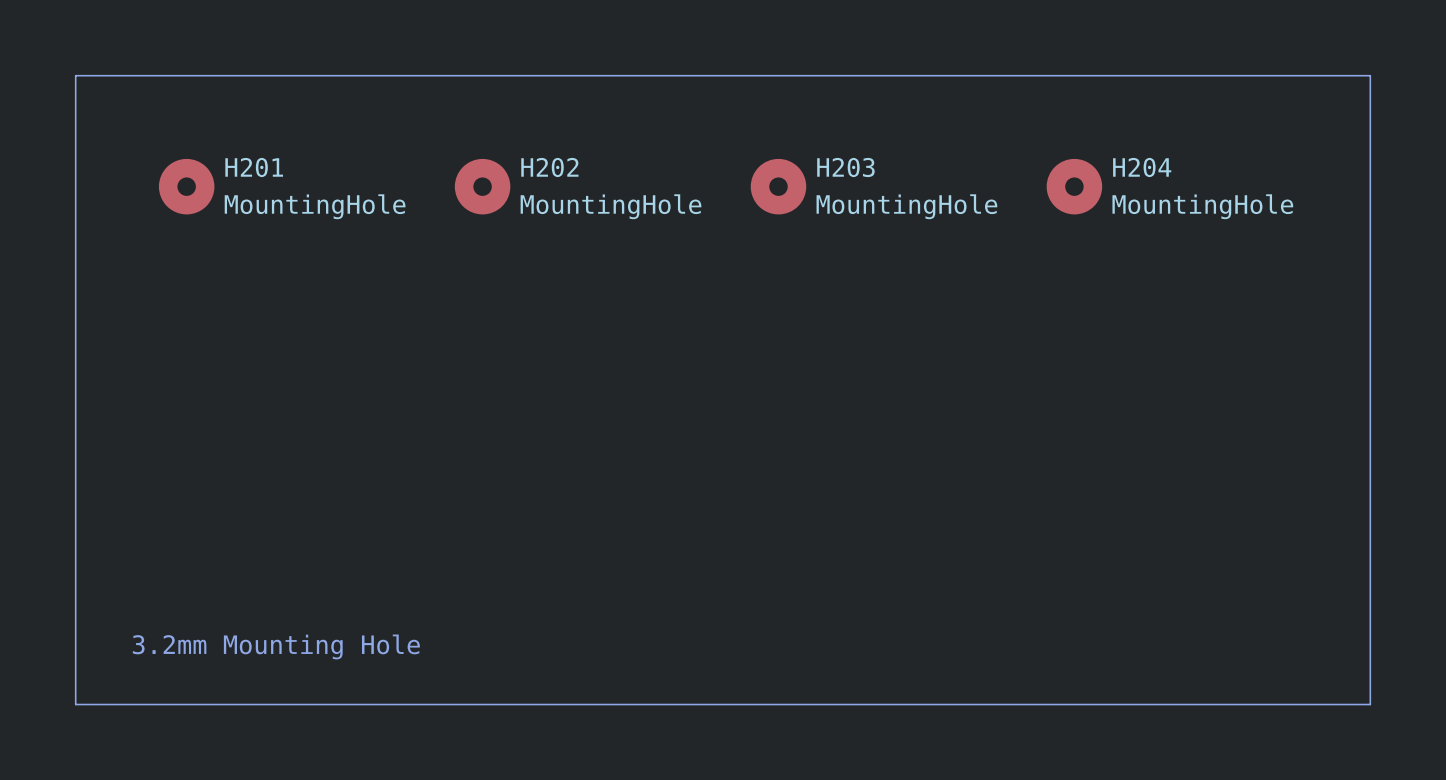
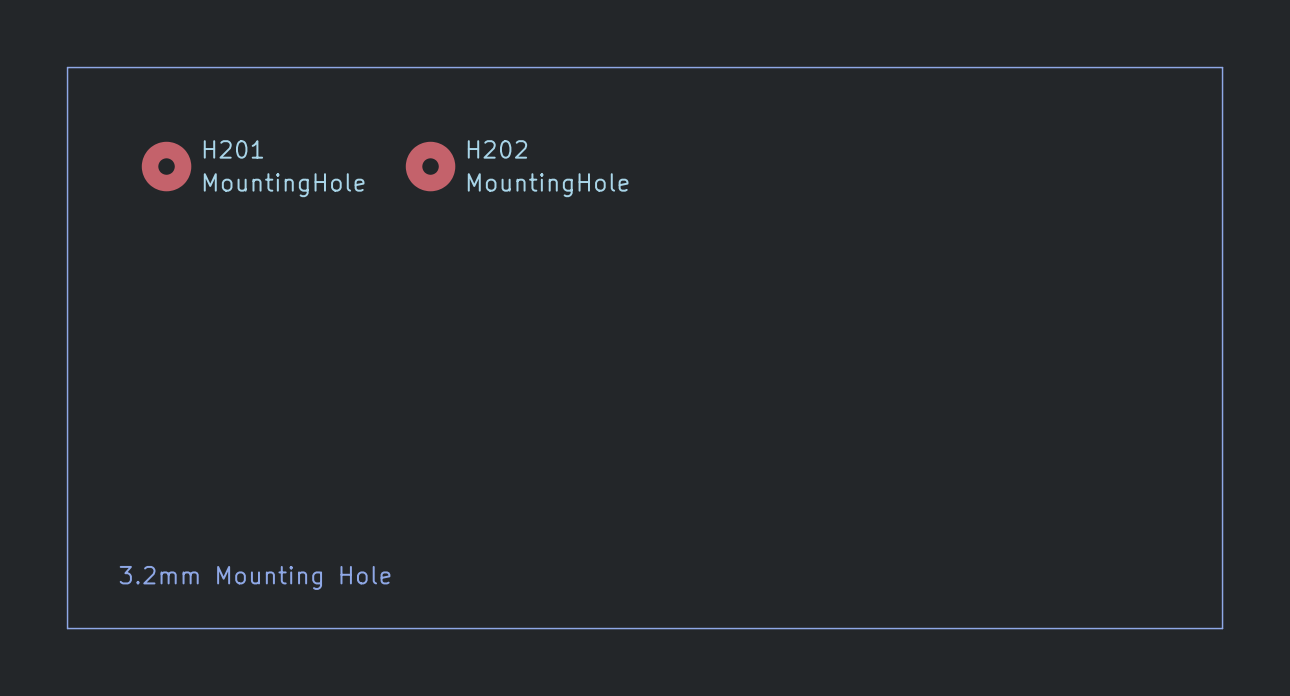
H203: MountingHole (778, 186) -> none
H204: MountingHole (1074, 186) -> none

